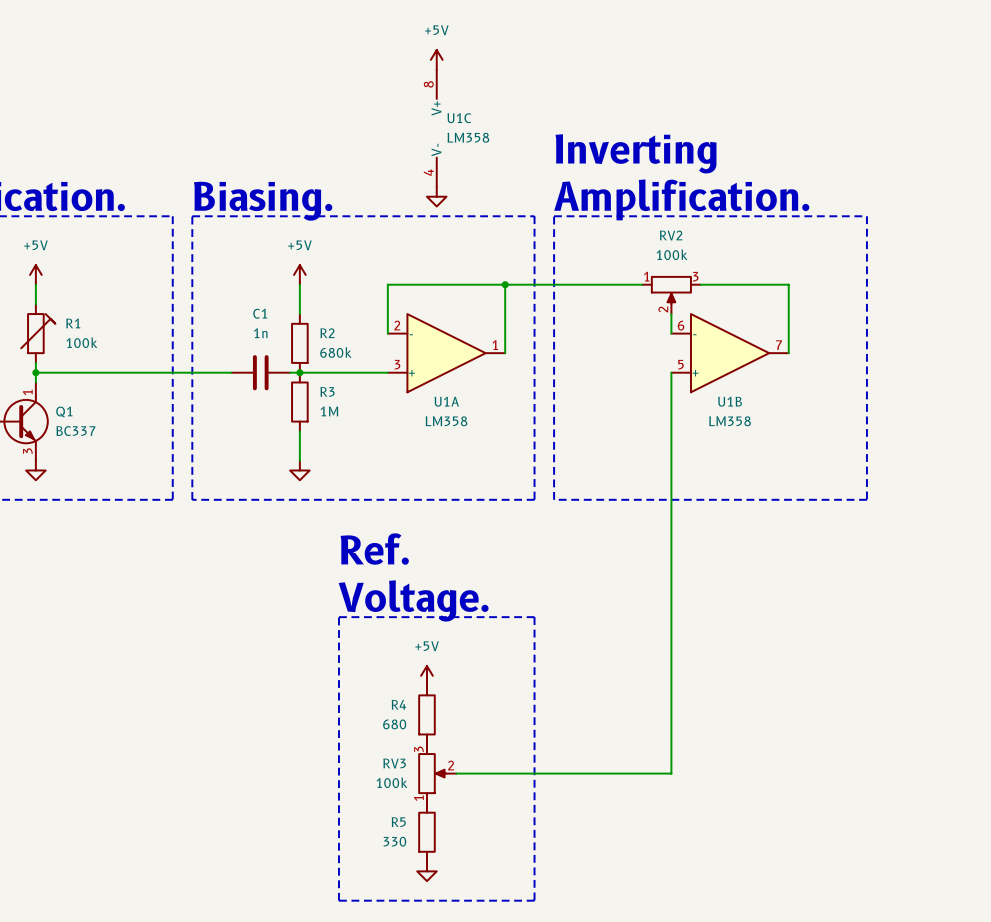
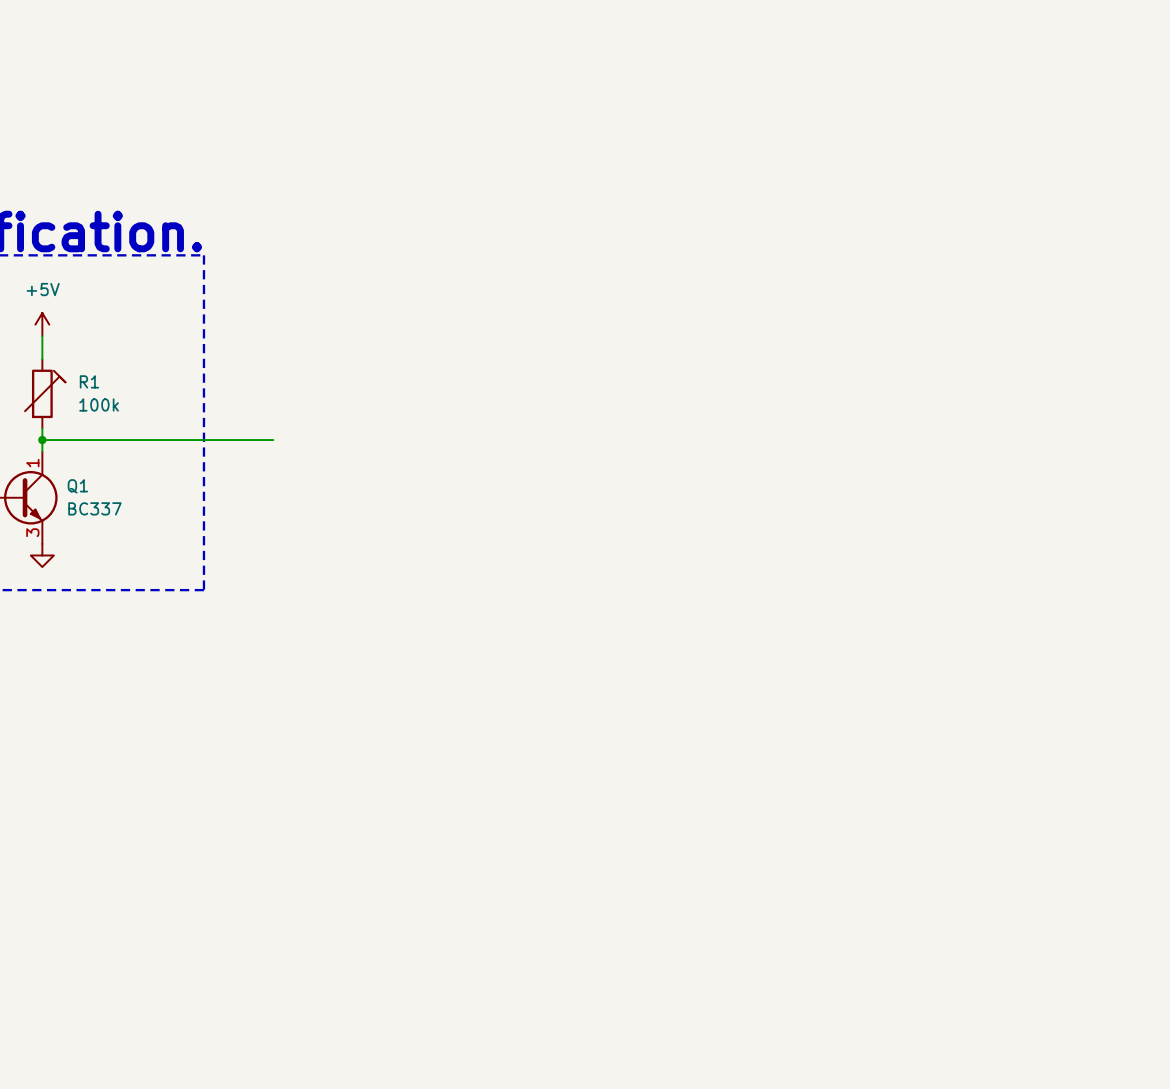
power symbol: +5V (436, 59) -> none
U1C: LM358 (436, 128) -> none
text: Inverting (636, 153) -> none
power symbol: (436, 196) -> none
text: Amplification. (681, 199) -> none
text: Biasing. (263, 201) -> none
line: (192, 216) (534, 216) (534, 499) (192, 499) (192, 216) -> none
line: (554, 216) (866, 216) (866, 499) (554, 499) (554, 216) -> none
power symbol: +5V (299, 274) -> none
wire: (299, 284) (299, 314) -> none
wire: (505, 284) (505, 353) -> none
junction: (505, 284) -> none
wire: (642, 284) (387, 284) (387, 333) -> none
wire: (700, 284) (788, 284) (788, 353) -> none
RV2: 100k (671, 294) -> none
wire: (671, 314) (671, 333) -> none
R2: 680k (299, 343) -> none
U1A: LM358 (446, 353) -> none
U1B: LM358 (730, 353) -> none
C1: 1n (260, 372) -> none
wire: (290, 372) (387, 372) -> none
junction: (299, 372) -> none
wire: (671, 372) (671, 773) (456, 773) -> none
R3: 1M (299, 402) -> none
wire: (299, 431) (299, 460) -> none
power symbol: (299, 470) -> none
text: Ref. (374, 549) -> none
text: Voltage. (413, 600) -> none
line: (338, 617) (534, 617) (534, 900) (338, 900) (338, 617) -> none
power symbol: +5V (426, 675) -> none
R4: 680 (426, 714) -> none
RV3: 100k (437, 773) -> none
R5: 330 (426, 832) -> none
power symbol: (426, 871) -> none

